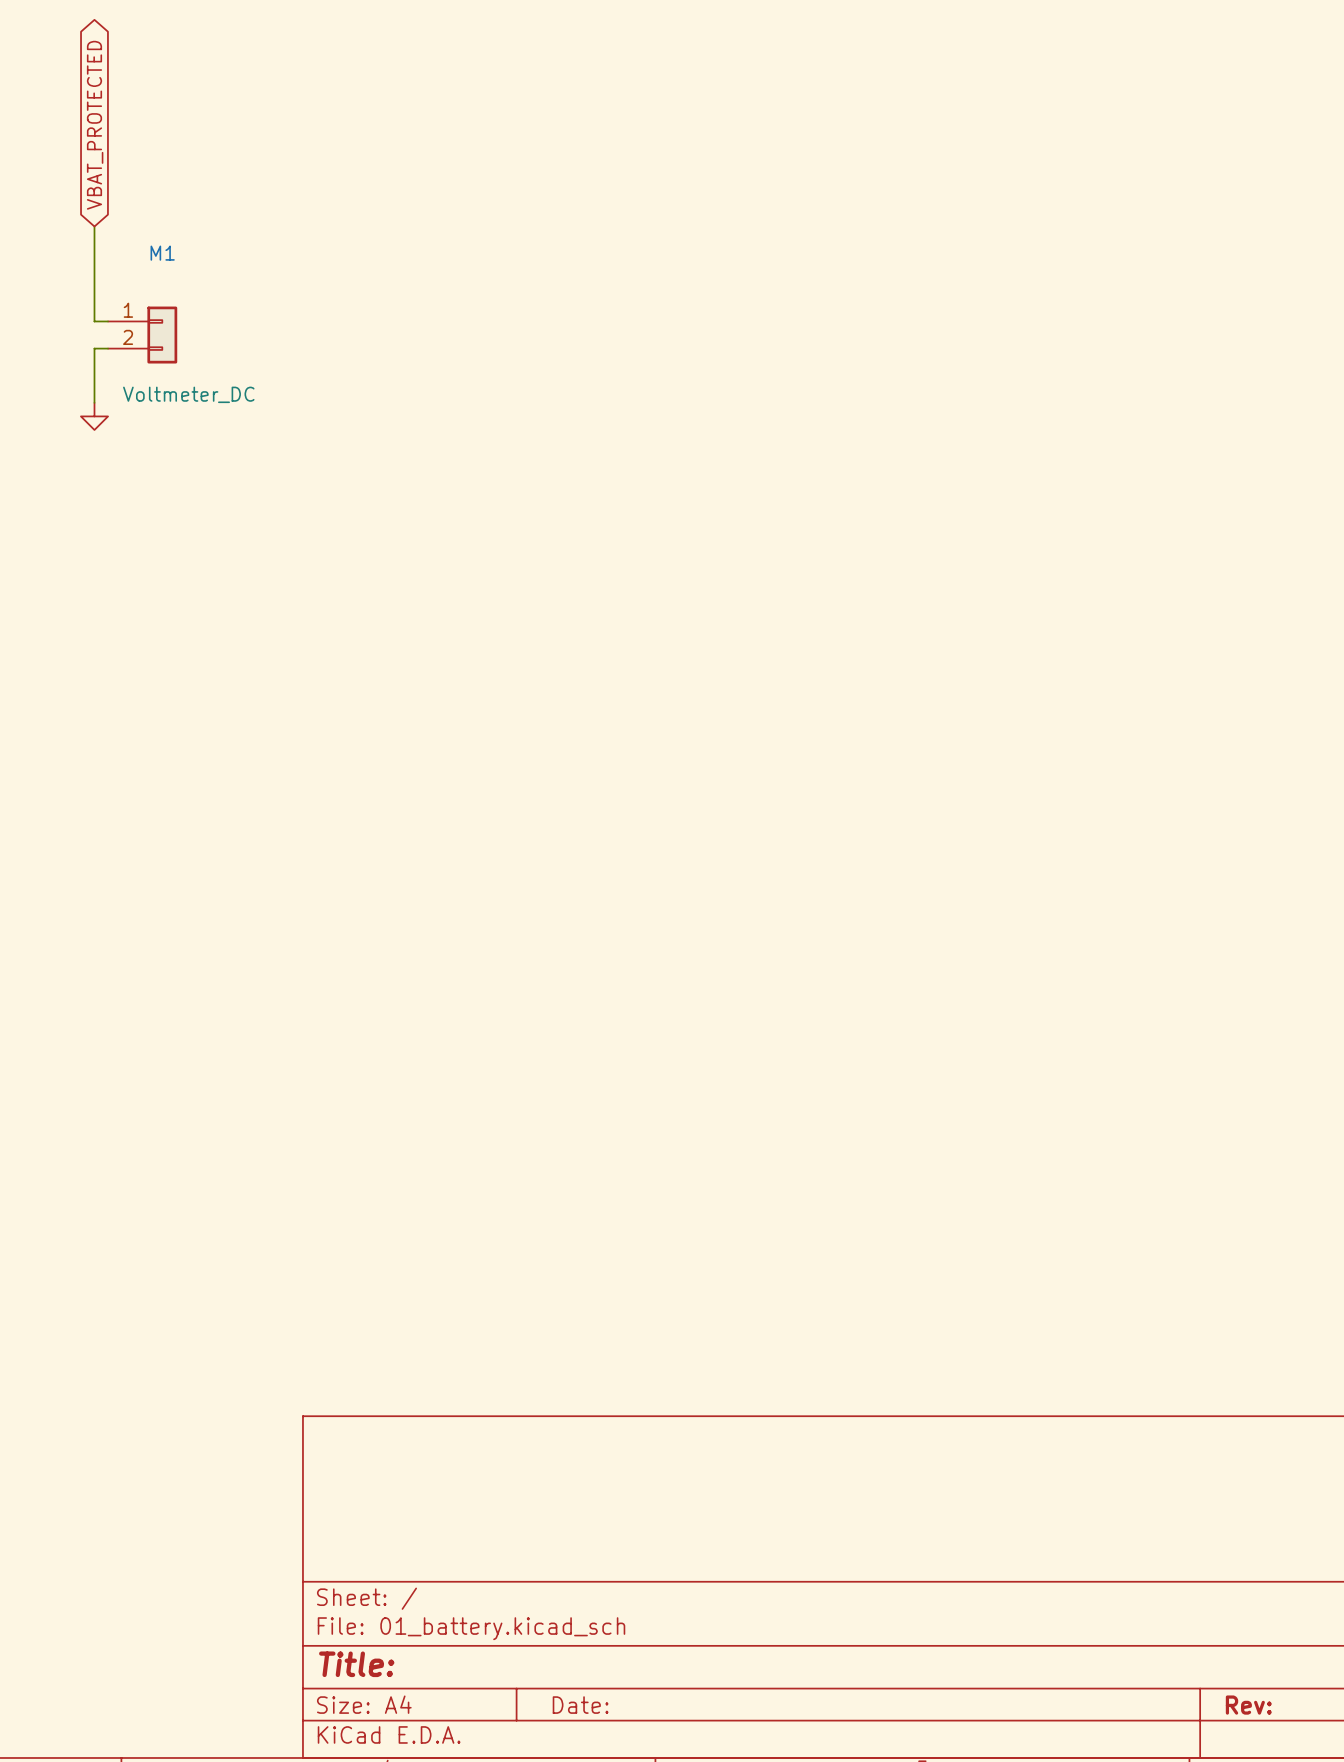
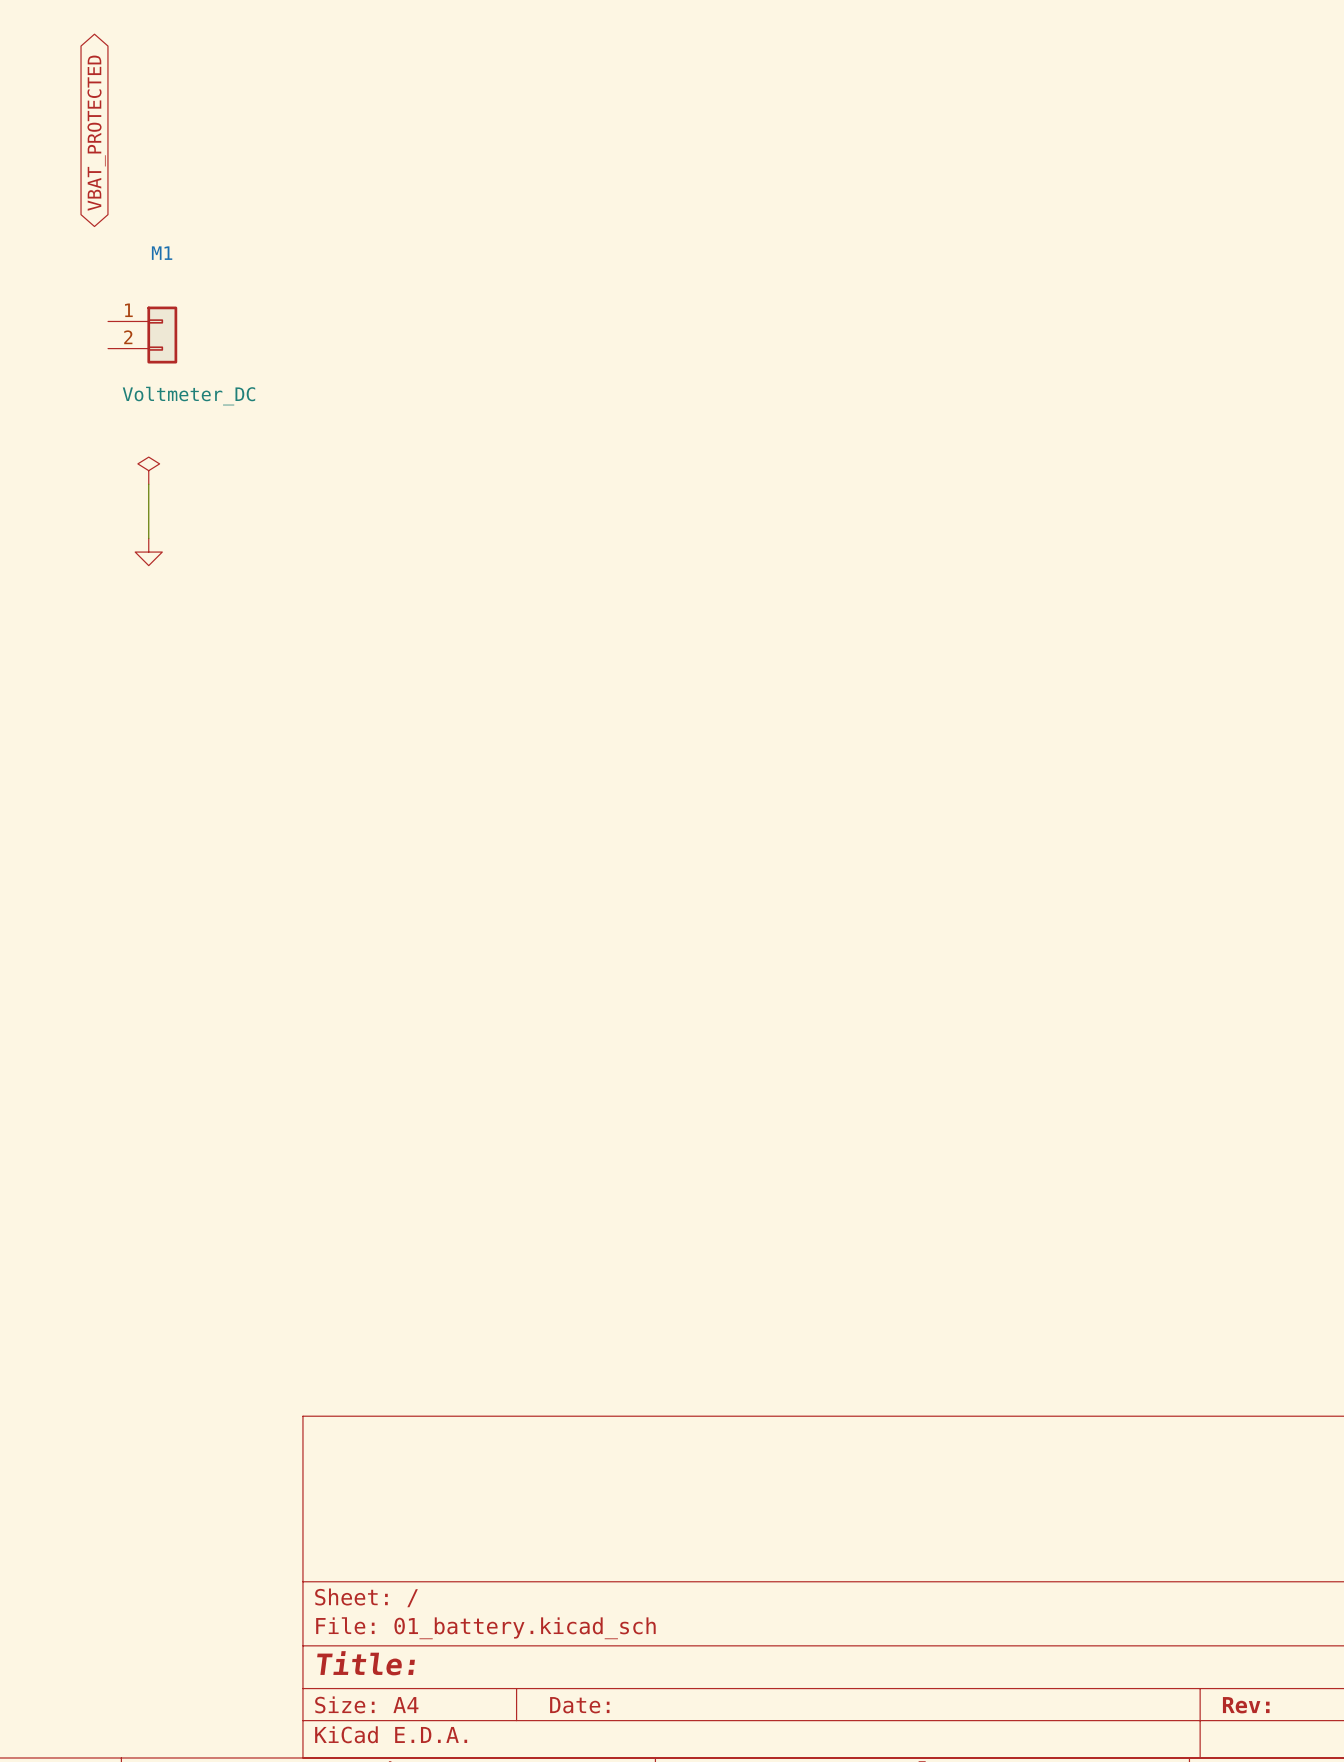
wire: (94, 226) (94, 321) (108, 321) -> none
wire: (108, 348) (94, 348) (94, 402) -> none
power symbol: (94, 416) -> none
power symbol: none -> (148, 470)
wire: none -> (148, 484) (148, 538)
power symbol: none -> (148, 552)

